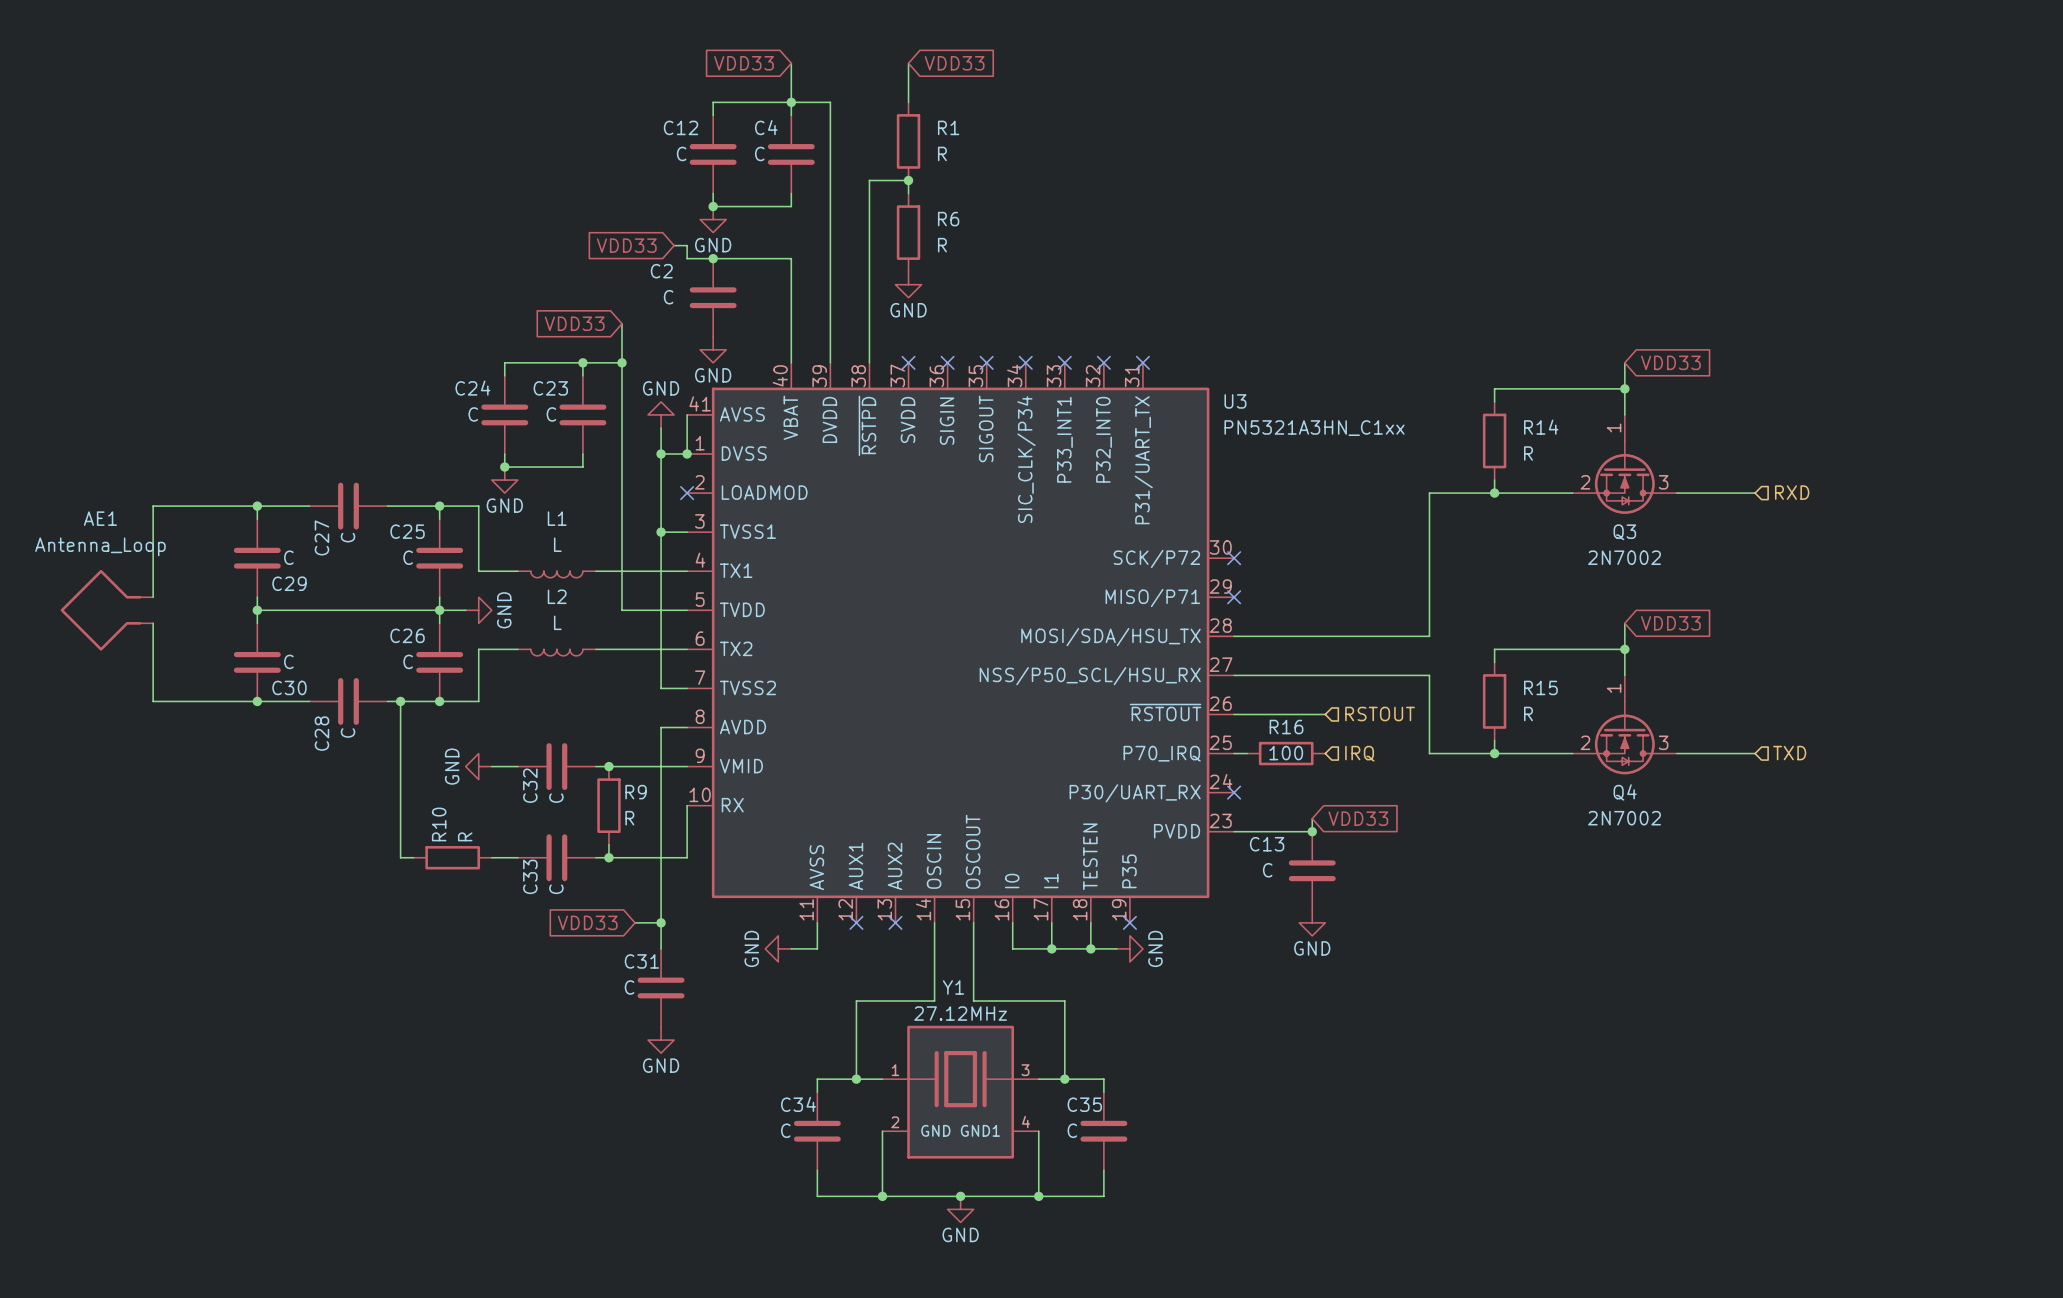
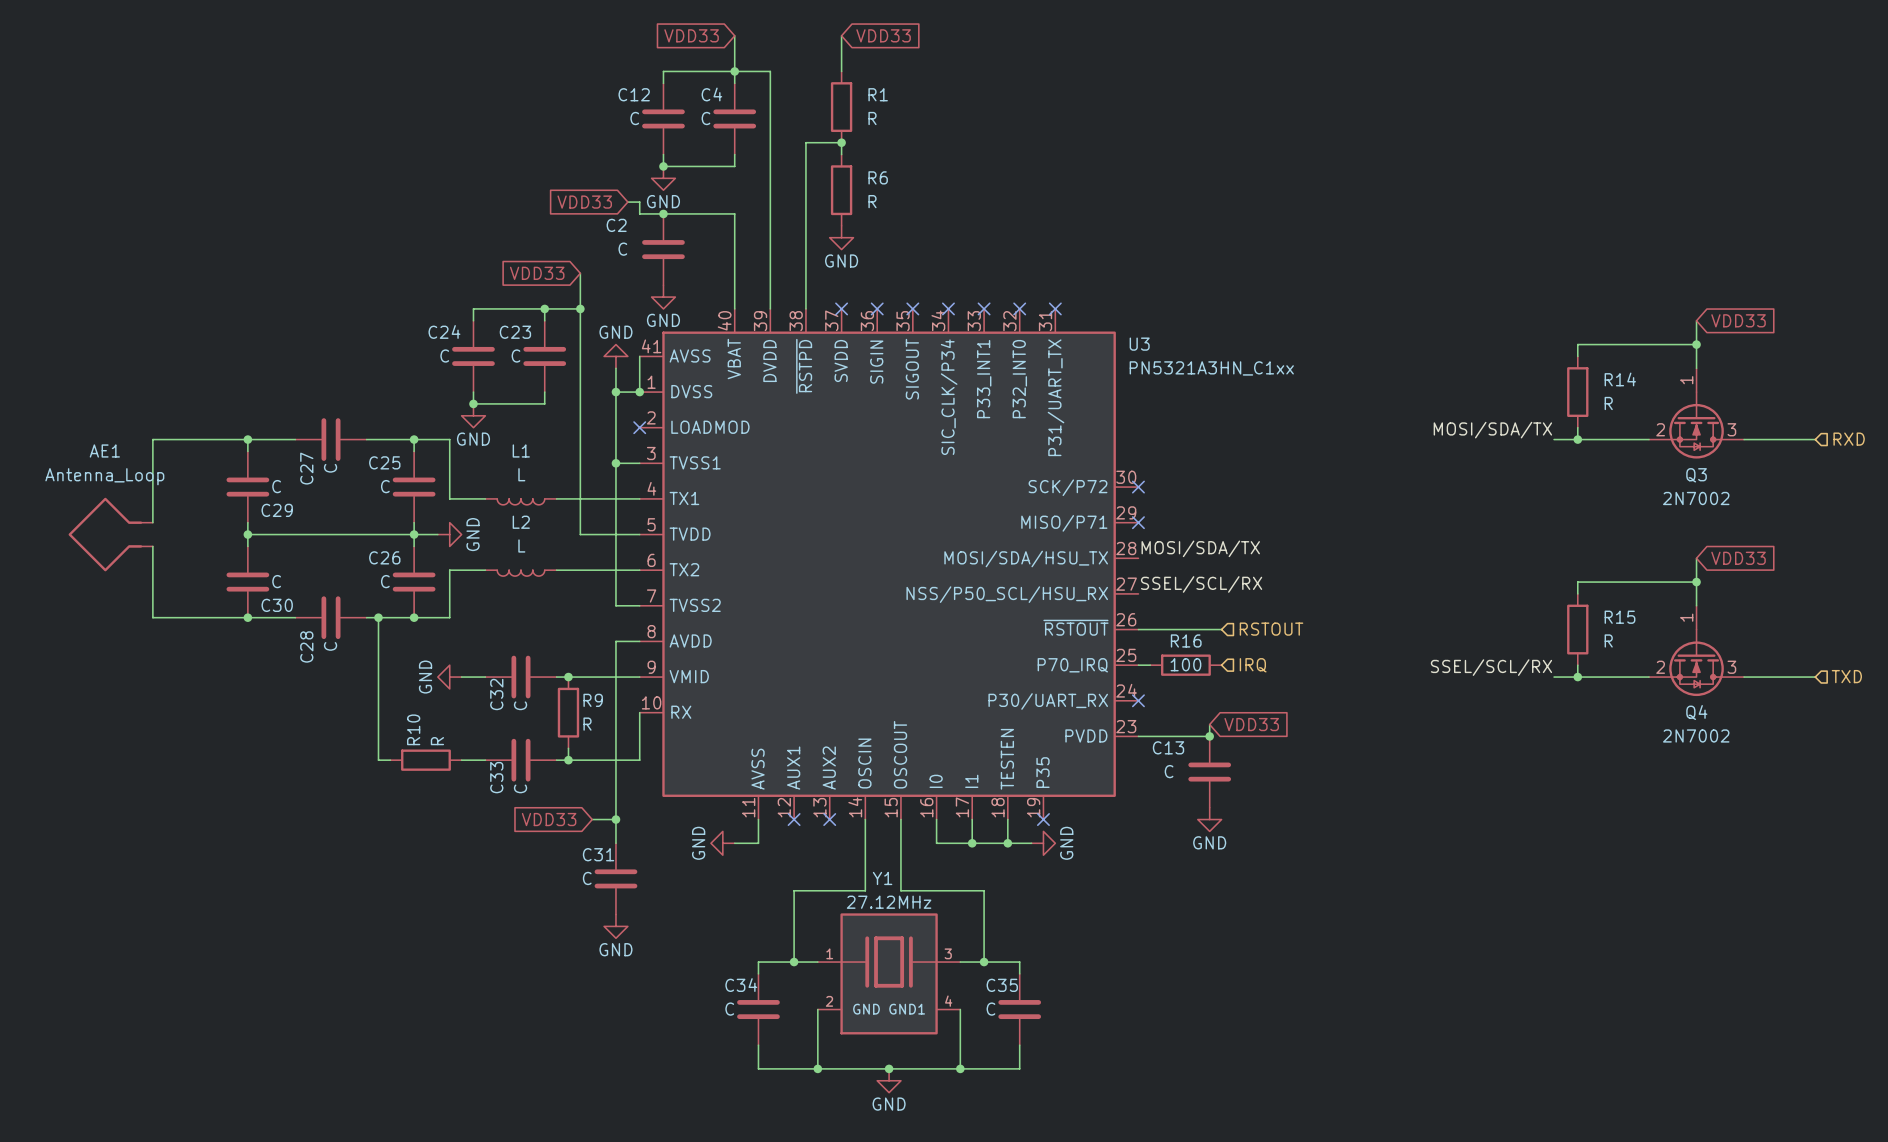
wire: (1624, 362) (1624, 414) -> (1696, 320) (1696, 368)
global label: VDD33 (1670, 362) -> none
global label: none -> VDD33 (1738, 320)
wire: (1624, 388) (1494, 388) (1494, 401) -> (1696, 344) (1577, 344) (1577, 356)
junction: (1624, 388) -> none
junction: none -> (1696, 344)
R14 position: (1494, 440) -> (1577, 392)
Q3 position: (1624, 464) -> (1696, 413)
wire: (1494, 480) (1494, 493) -> (1577, 427) (1577, 439)
hierarchical label position: RXD (1792, 492) -> RXD (1849, 439)
junction: (1494, 493) -> none
wire: (1572, 493) (1429, 493) (1429, 636) (1234, 636) -> none
wire: (1676, 493) (1755, 493) -> (1744, 439) (1815, 439)
label: none -> MOSI/SDA/TX (1492, 430)
wire: none -> (1554, 439) (1649, 439)
junction: none -> (1577, 439)
wire: (1624, 623) (1624, 675) -> (1696, 558) (1696, 605)
global label: VDD33 (1670, 623) -> none
label: none -> MOSI/SDA/TX (1200, 548)
global label: none -> VDD33 (1738, 558)
wire: (1624, 649) (1494, 649) (1494, 662) -> (1696, 582) (1577, 582) (1577, 593)
junction: (1624, 649) -> none
junction: none -> (1696, 582)
label: none -> SSEL/SCL/RX (1201, 584)
wire: (1234, 675) (1429, 675) (1429, 753) (1572, 753) -> none
R15 position: (1494, 701) -> (1577, 629)
Q4 position: (1624, 724) -> (1696, 650)
wire: (1494, 740) (1494, 753) -> (1577, 665) (1577, 677)
junction: (1494, 753) -> none
wire: (1676, 753) (1755, 753) -> (1744, 677) (1815, 677)
hierarchical label position: TXD (1789, 753) -> TXD (1846, 676)
label: none -> SSEL/SCL/RX (1491, 667)
wire: none -> (1554, 677) (1649, 677)
junction: none -> (1577, 677)

